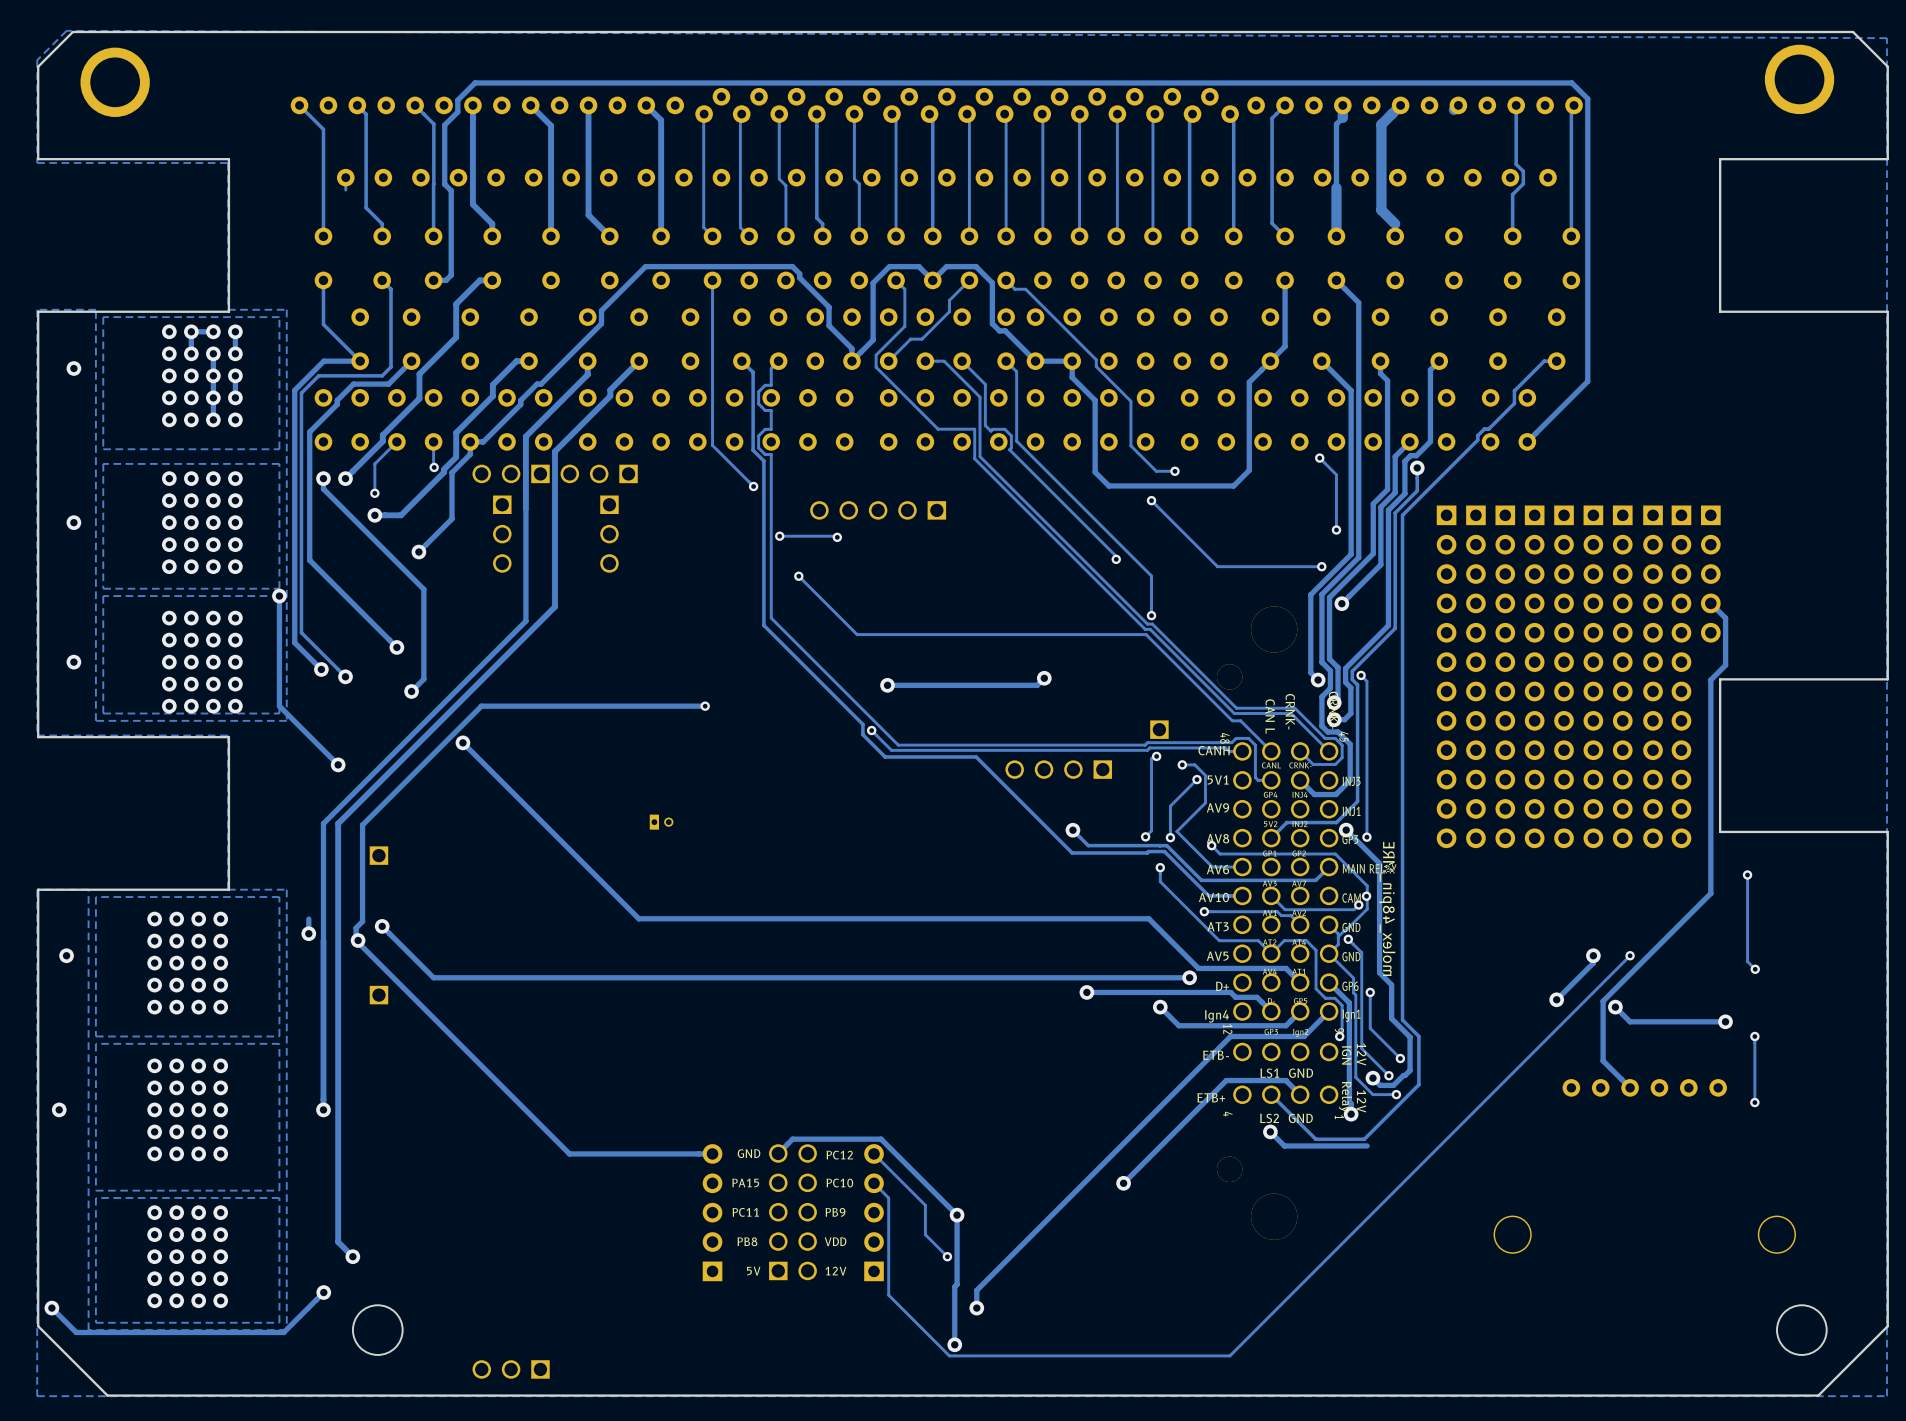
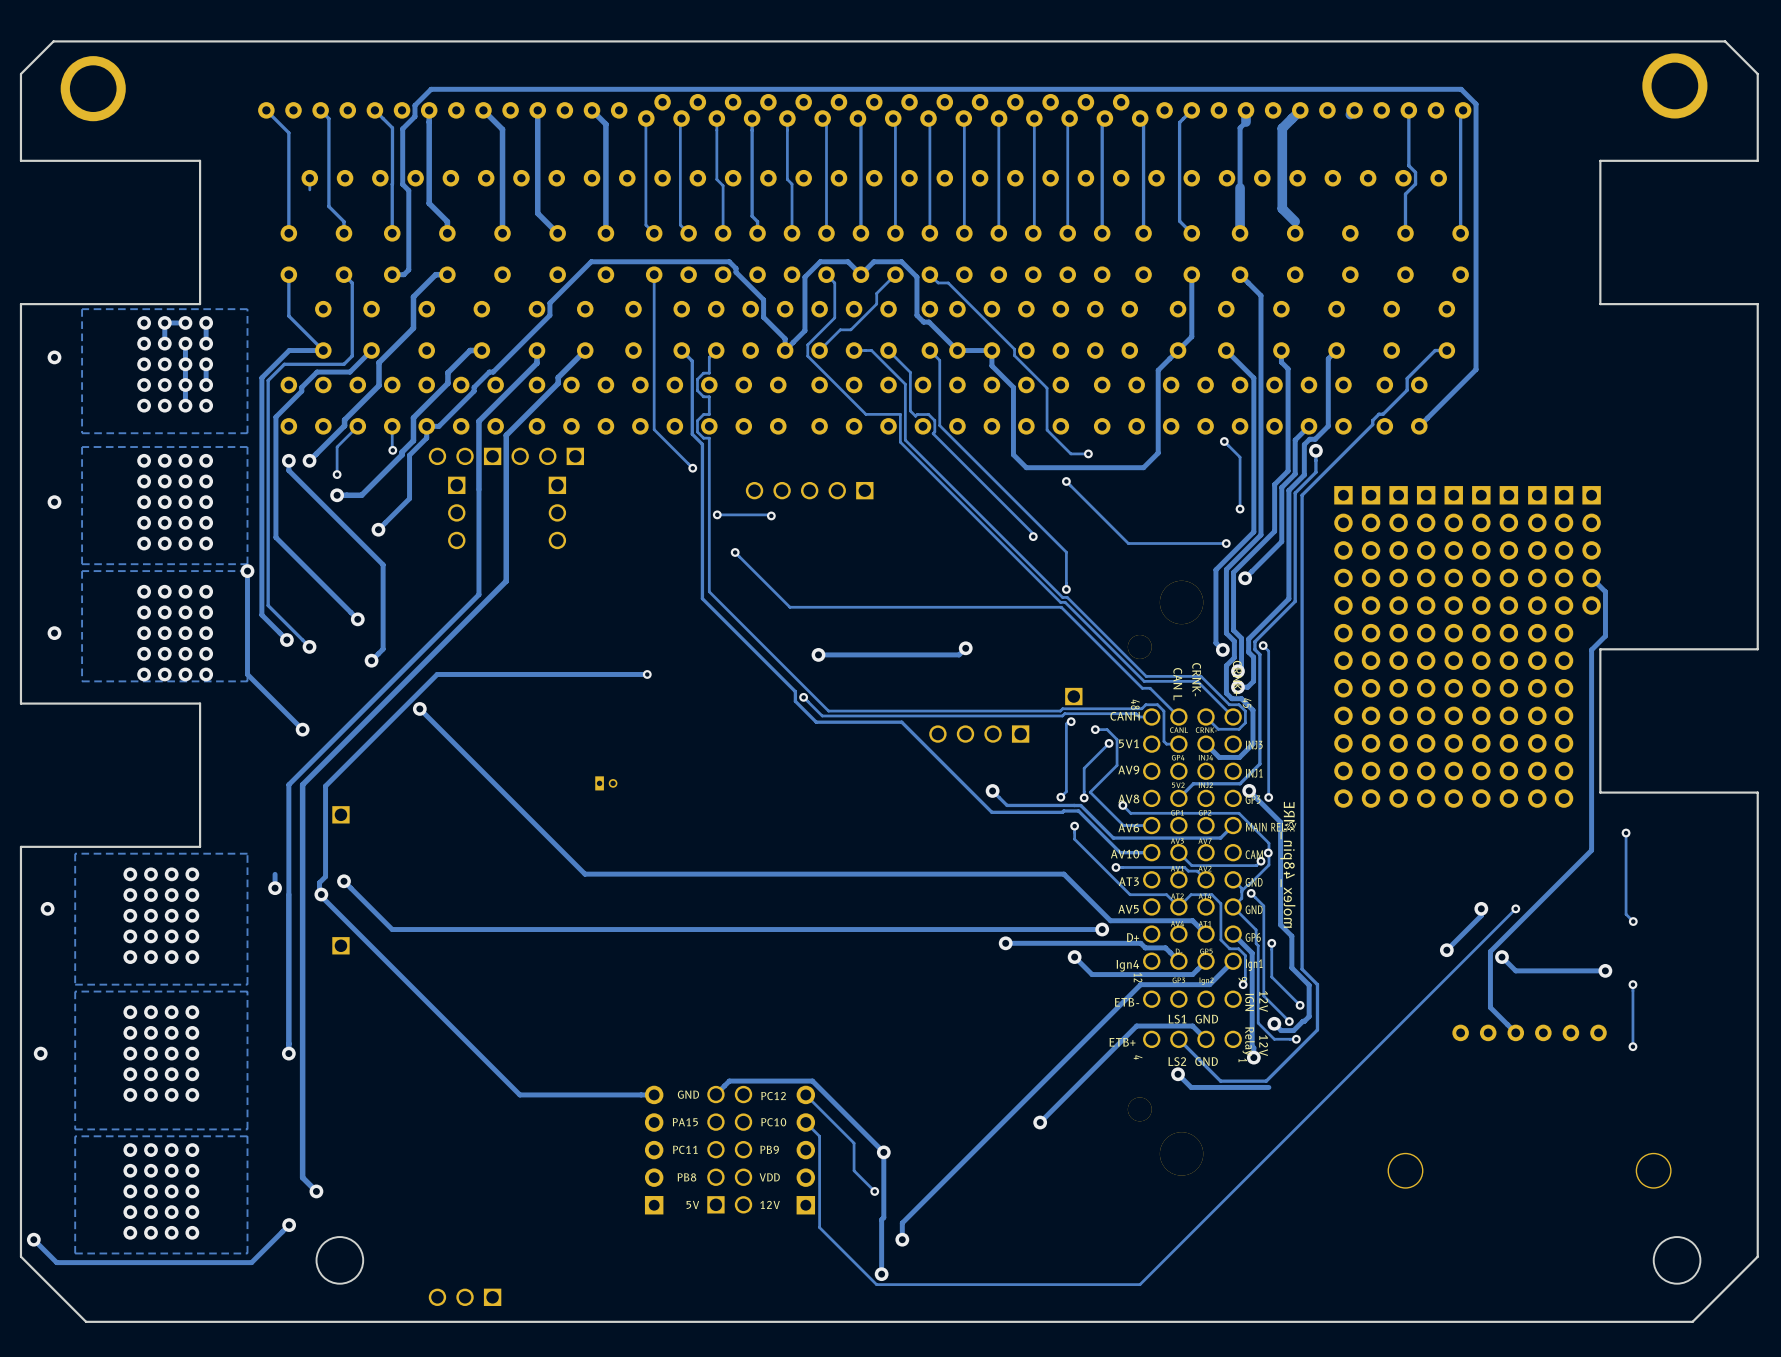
zone outline: (66, 30) (1887, 38) (1887, 1396) (37, 1396) (37, 889) (88, 889) (88, 1330) (286, 1330) (286, 889) (228, 889) (228, 735) (37, 735) (37, 309) (95, 309) (95, 720) (286, 720) (286, 309) (228, 309) (228, 162) (37, 162) (37, 60) (66, 30) -> none

